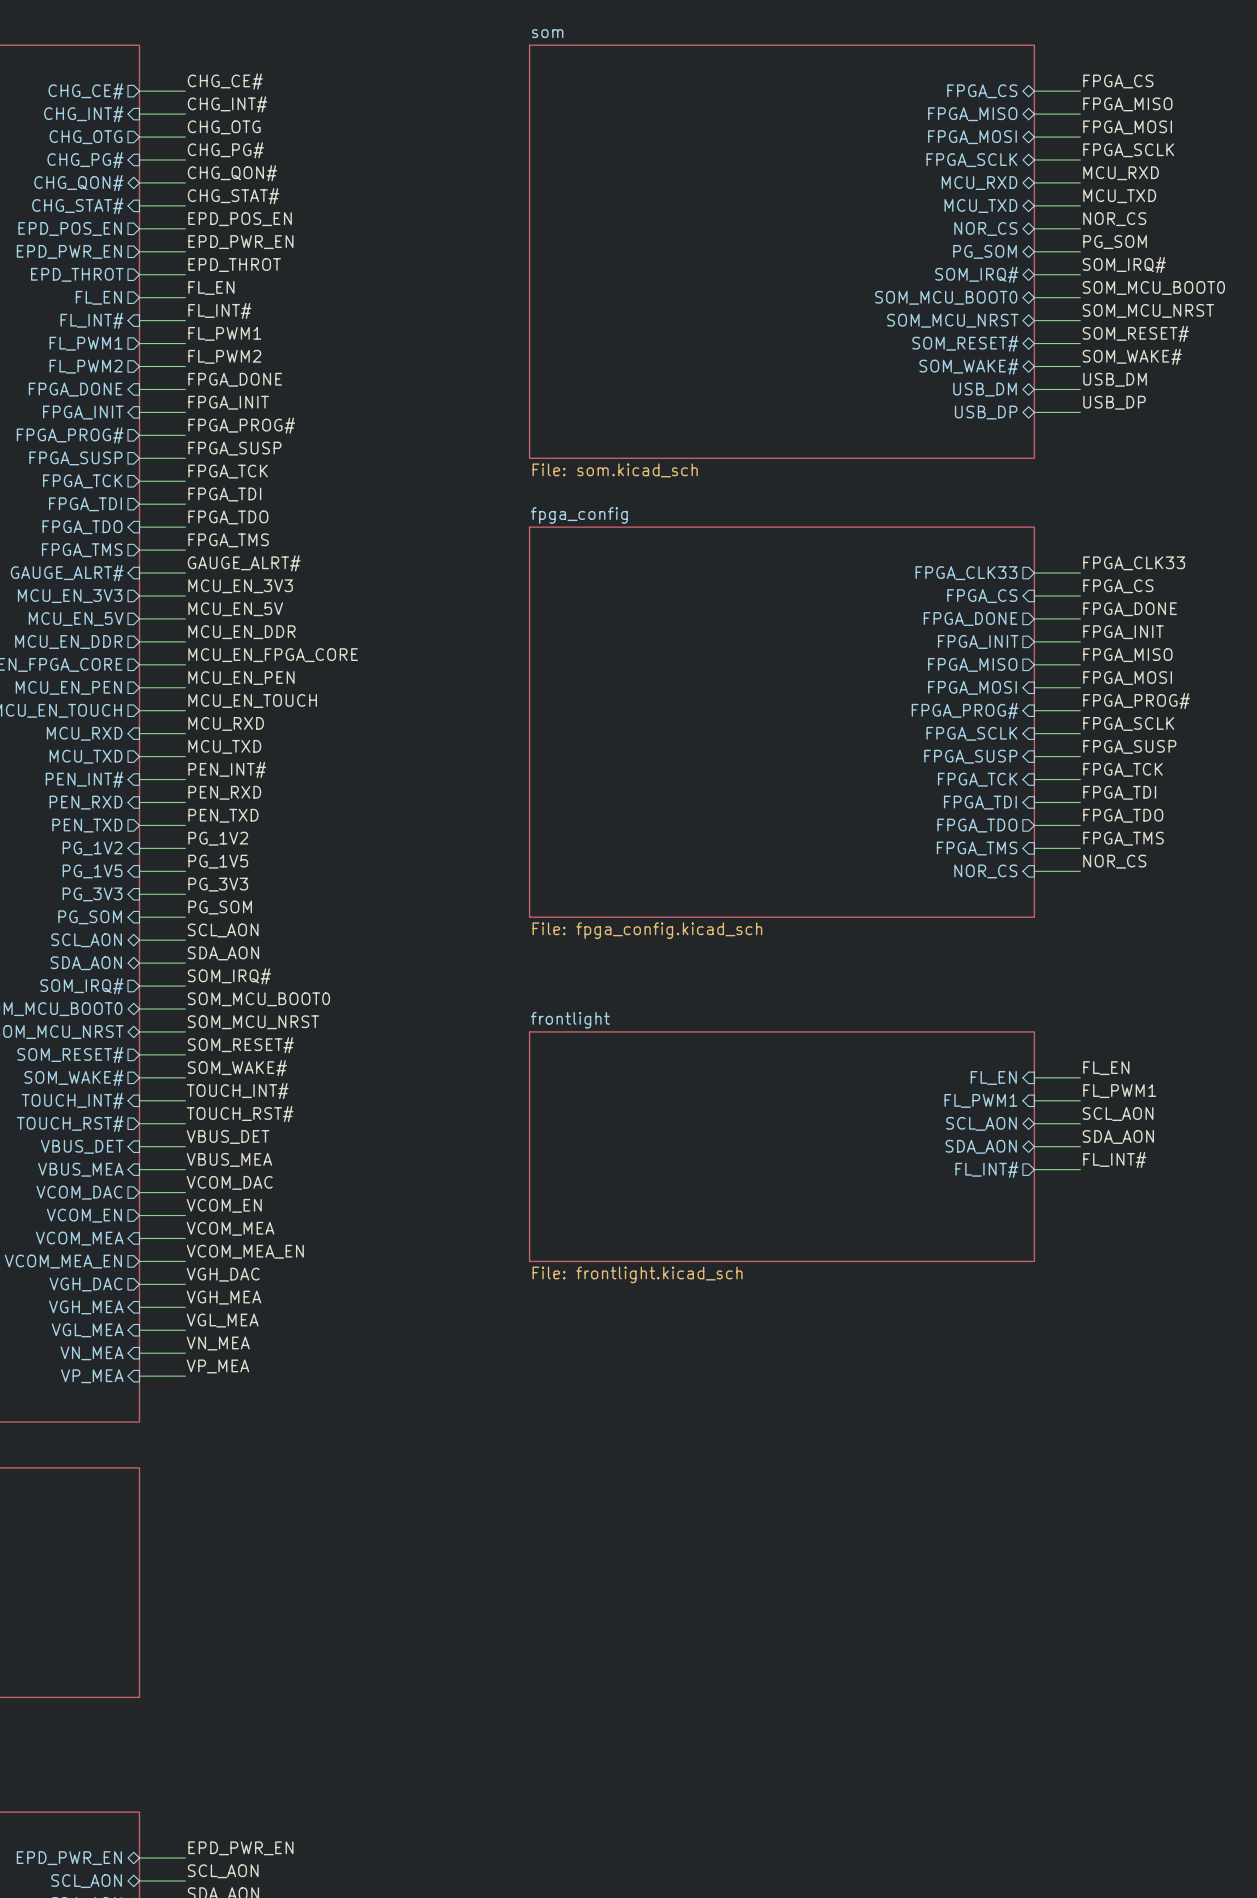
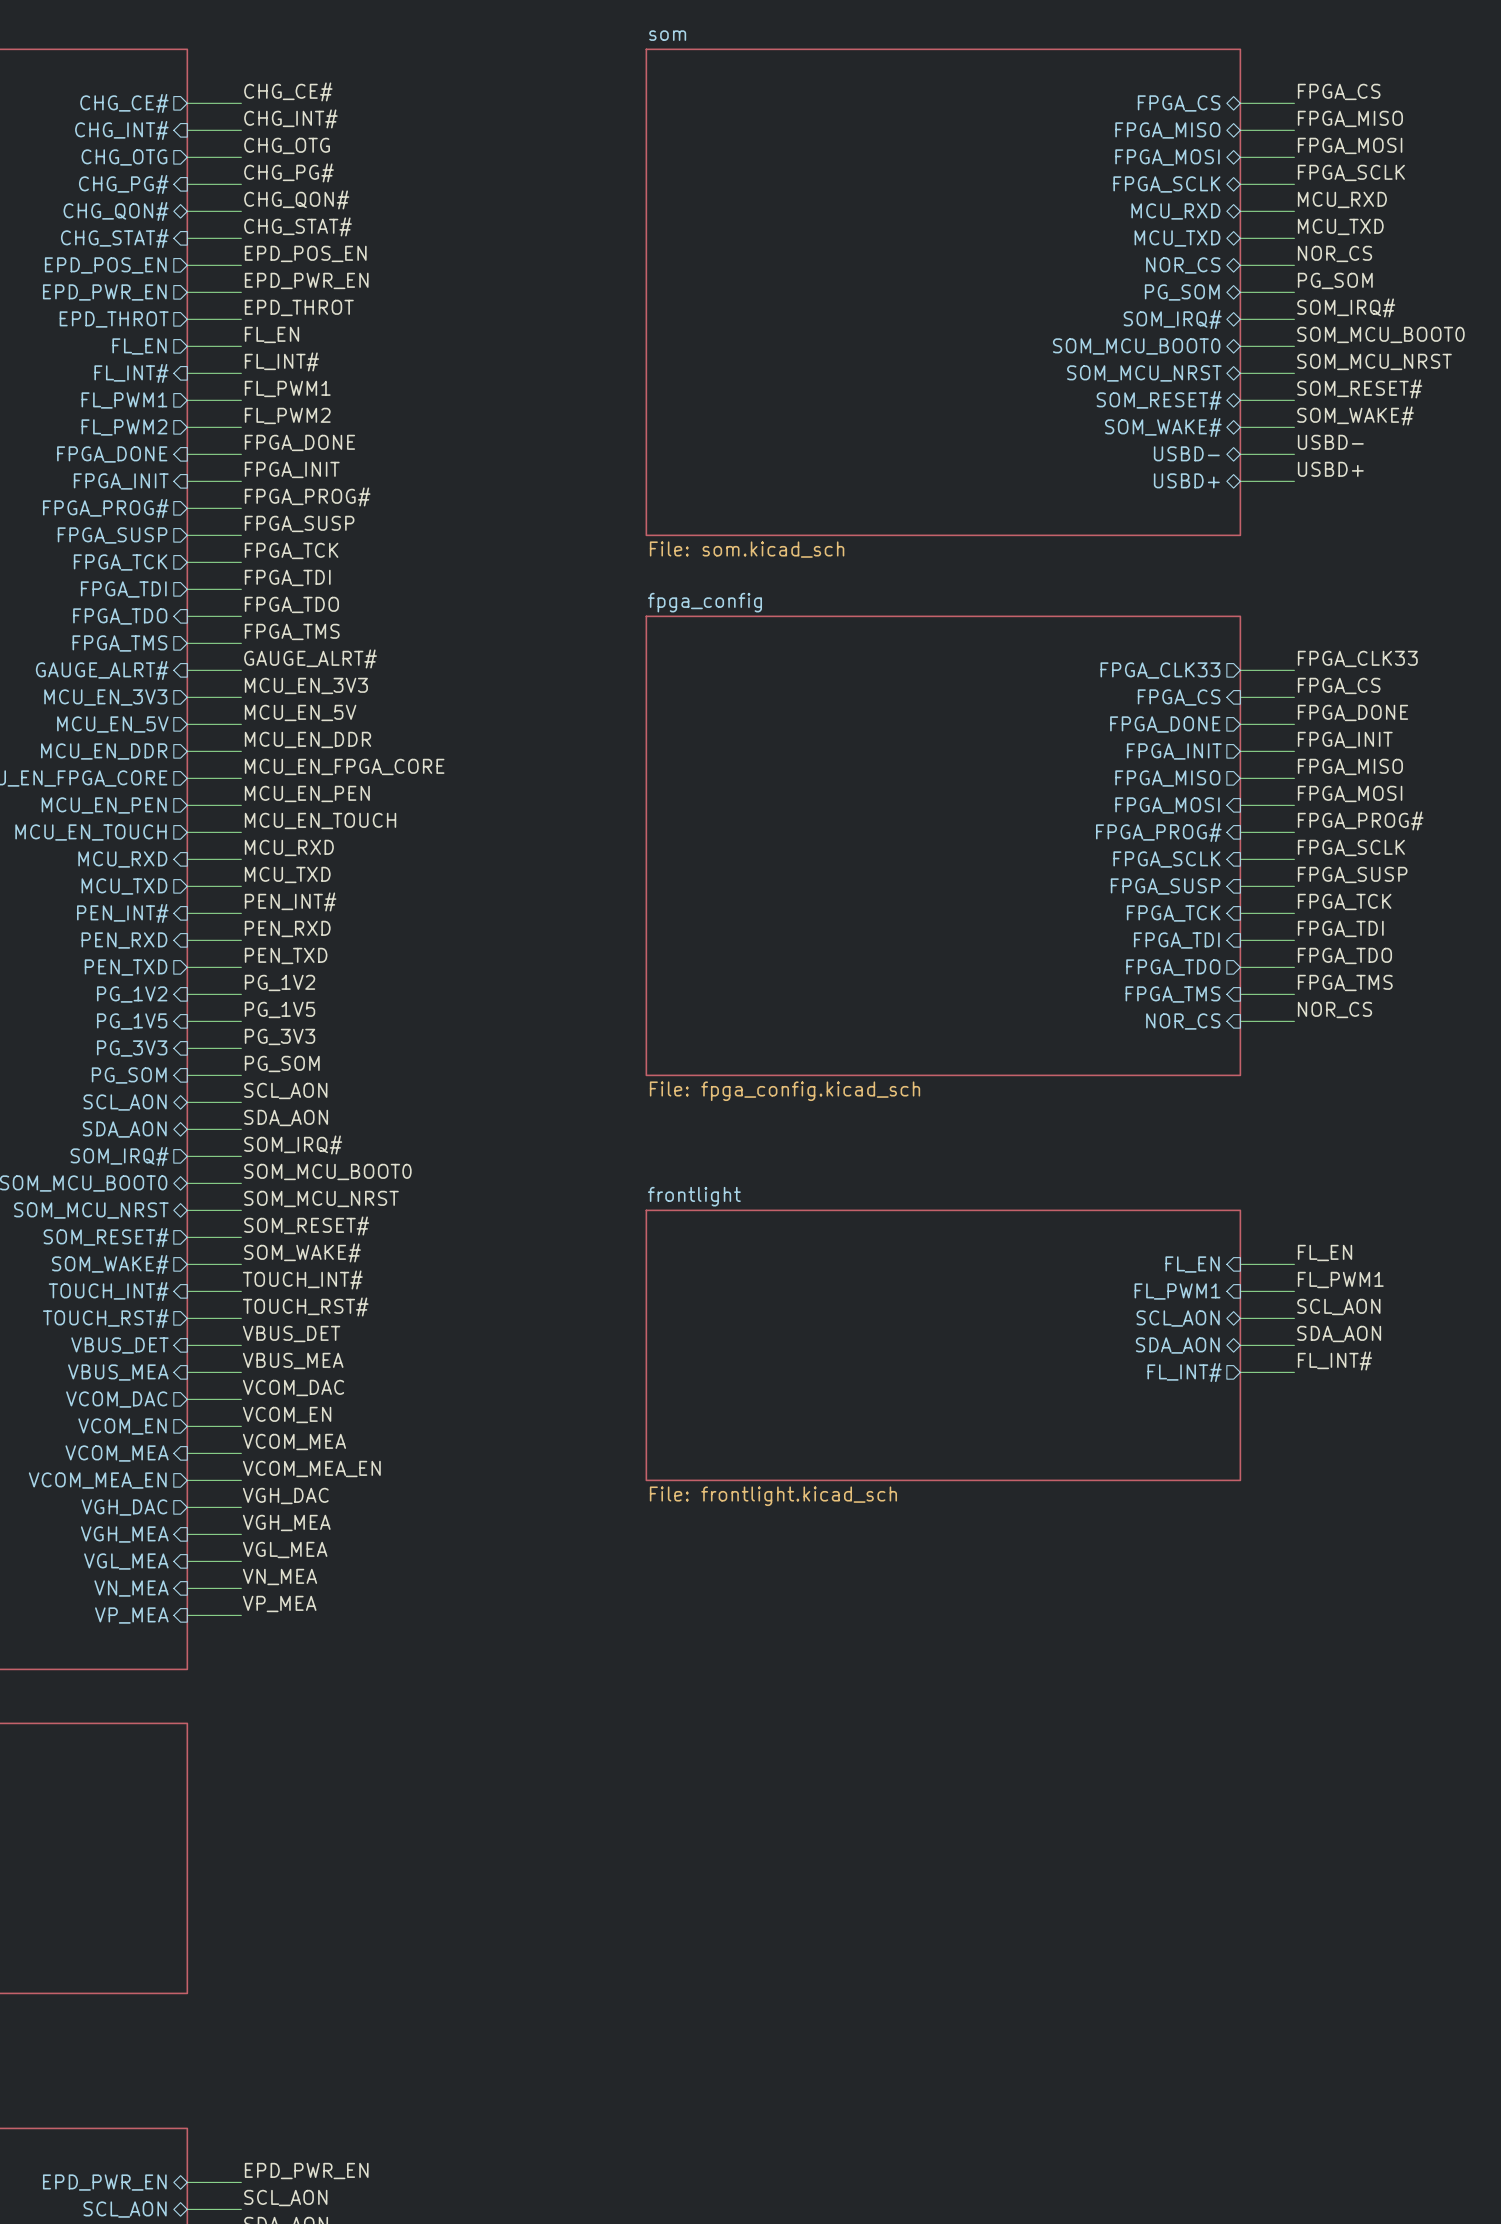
label: USB_DM (1115, 379) -> USBD- (1330, 442)
sheet pin: USB_DM (985, 389) -> USBD- (1186, 453)
label: USB_DP (1114, 402) -> USBD+ (1330, 469)
sheet pin: USB_DP (986, 412) -> USBD+ (1186, 480)

